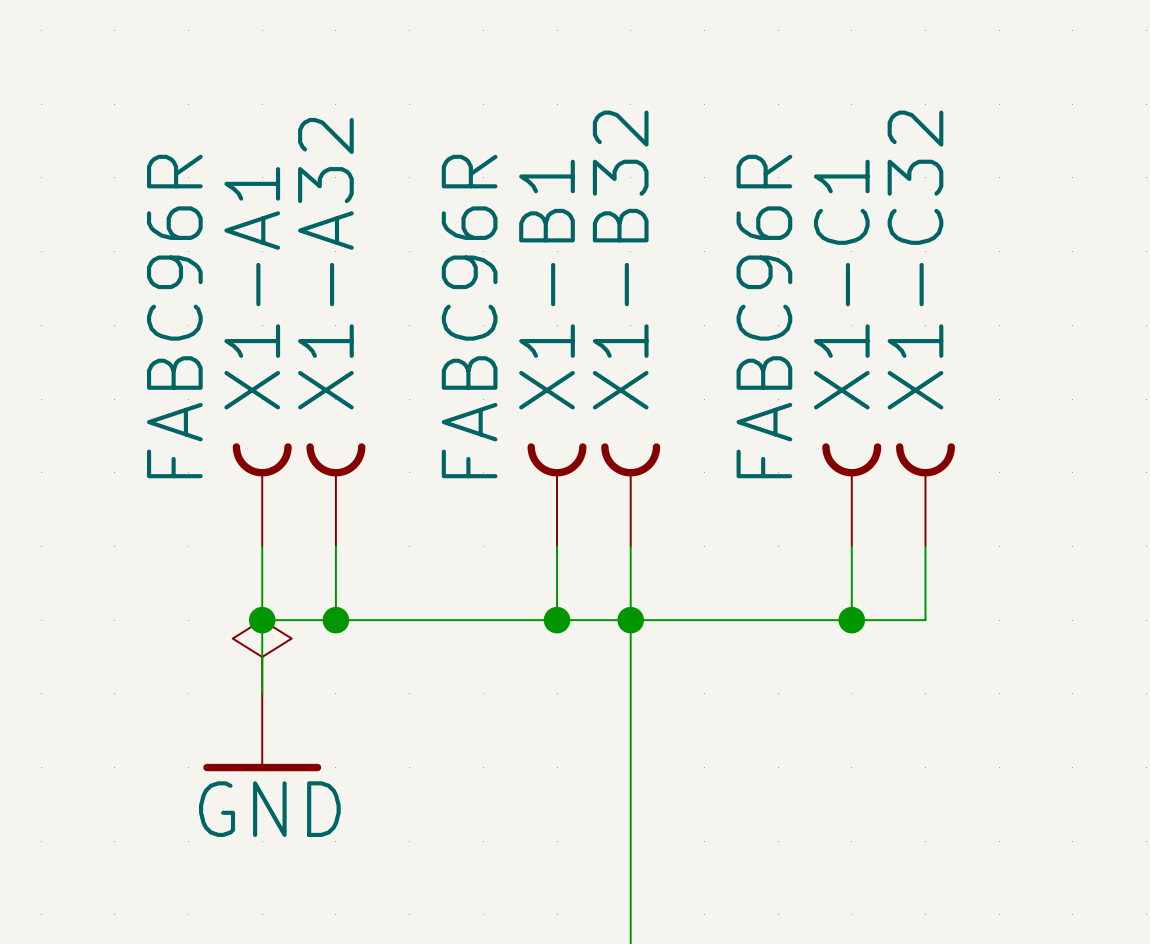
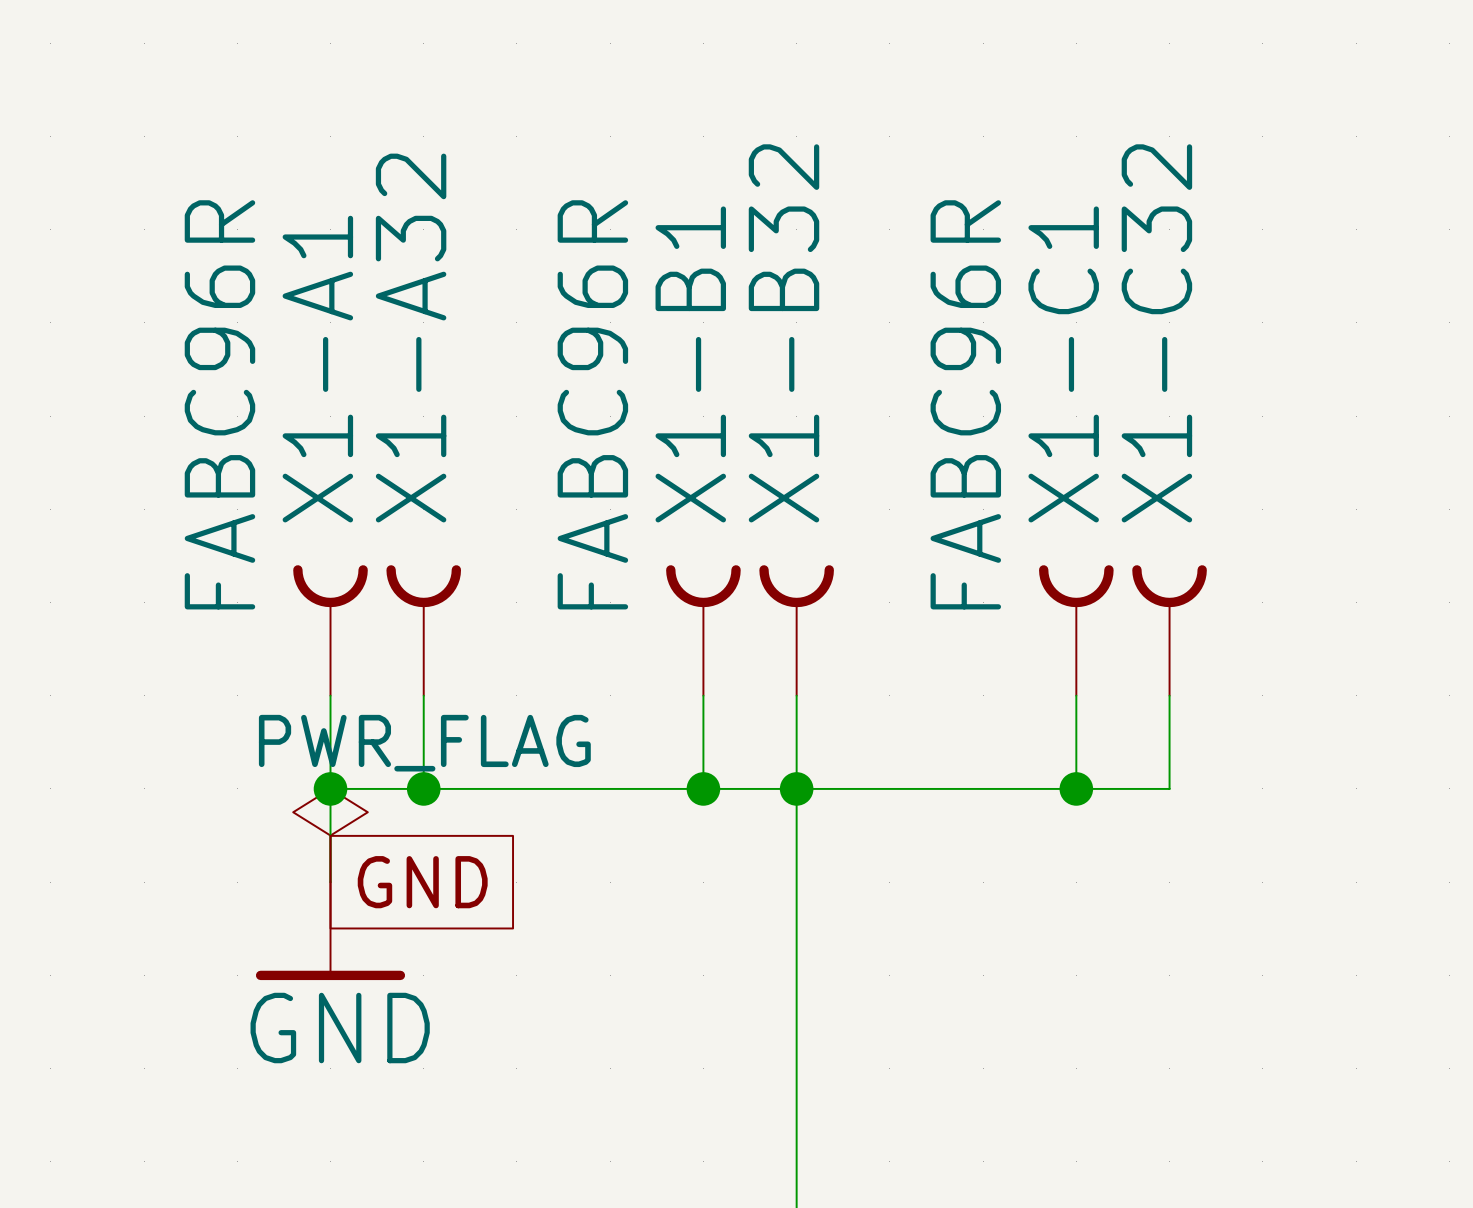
power symbol text: none -> PWR_FLAG (424, 743)
global label: none -> GND (422, 882)

